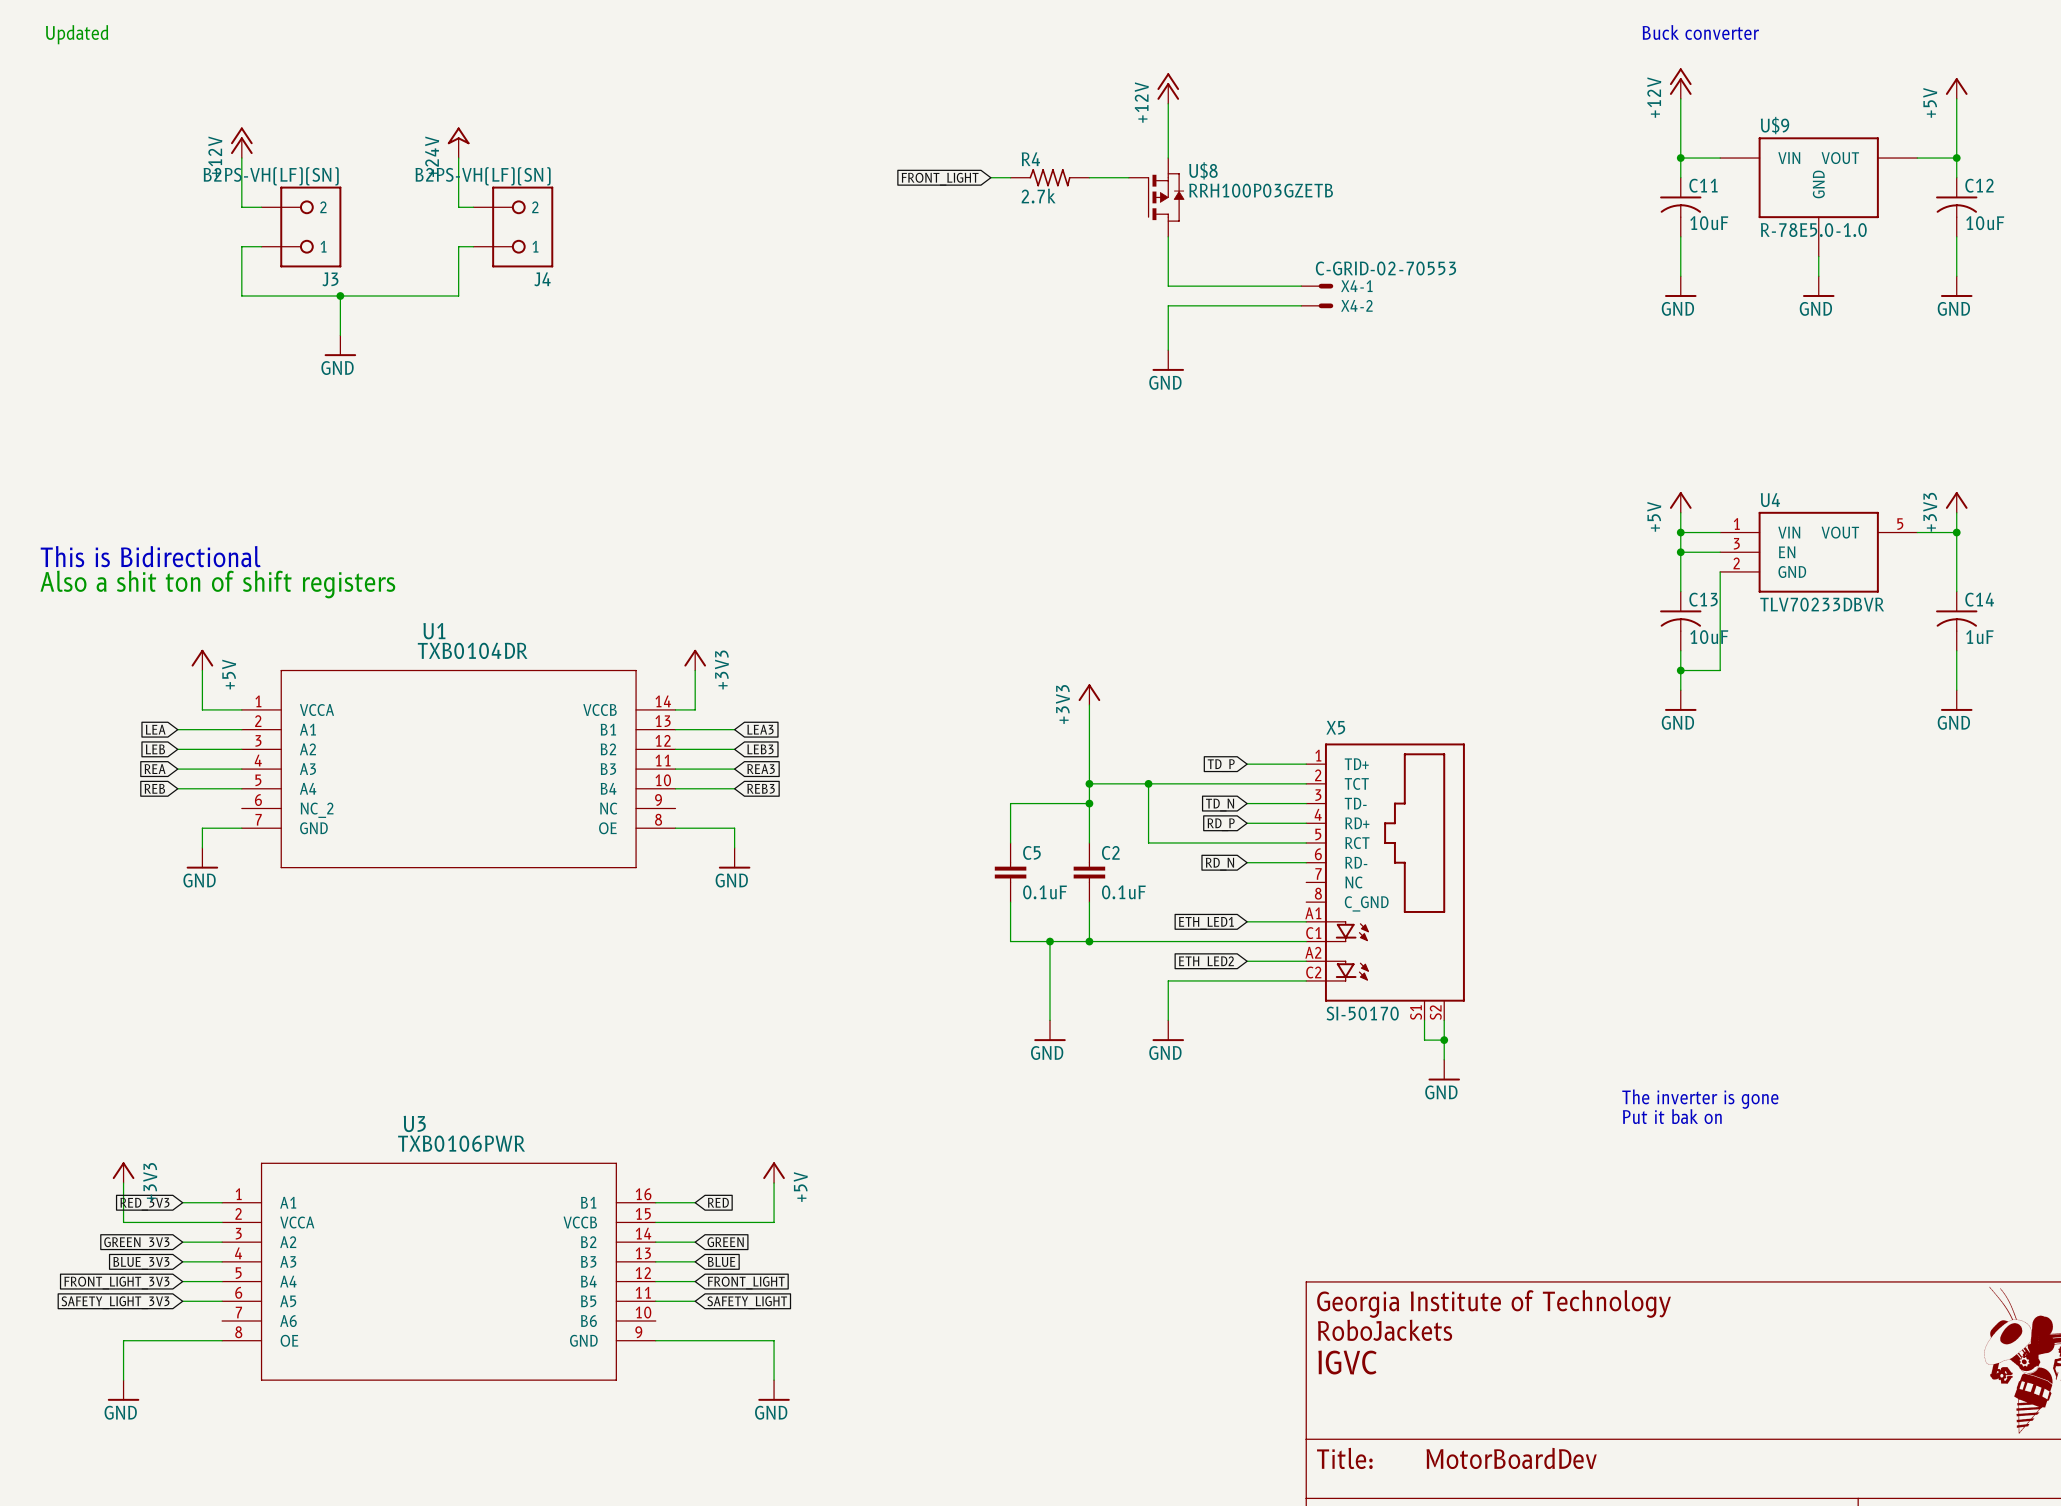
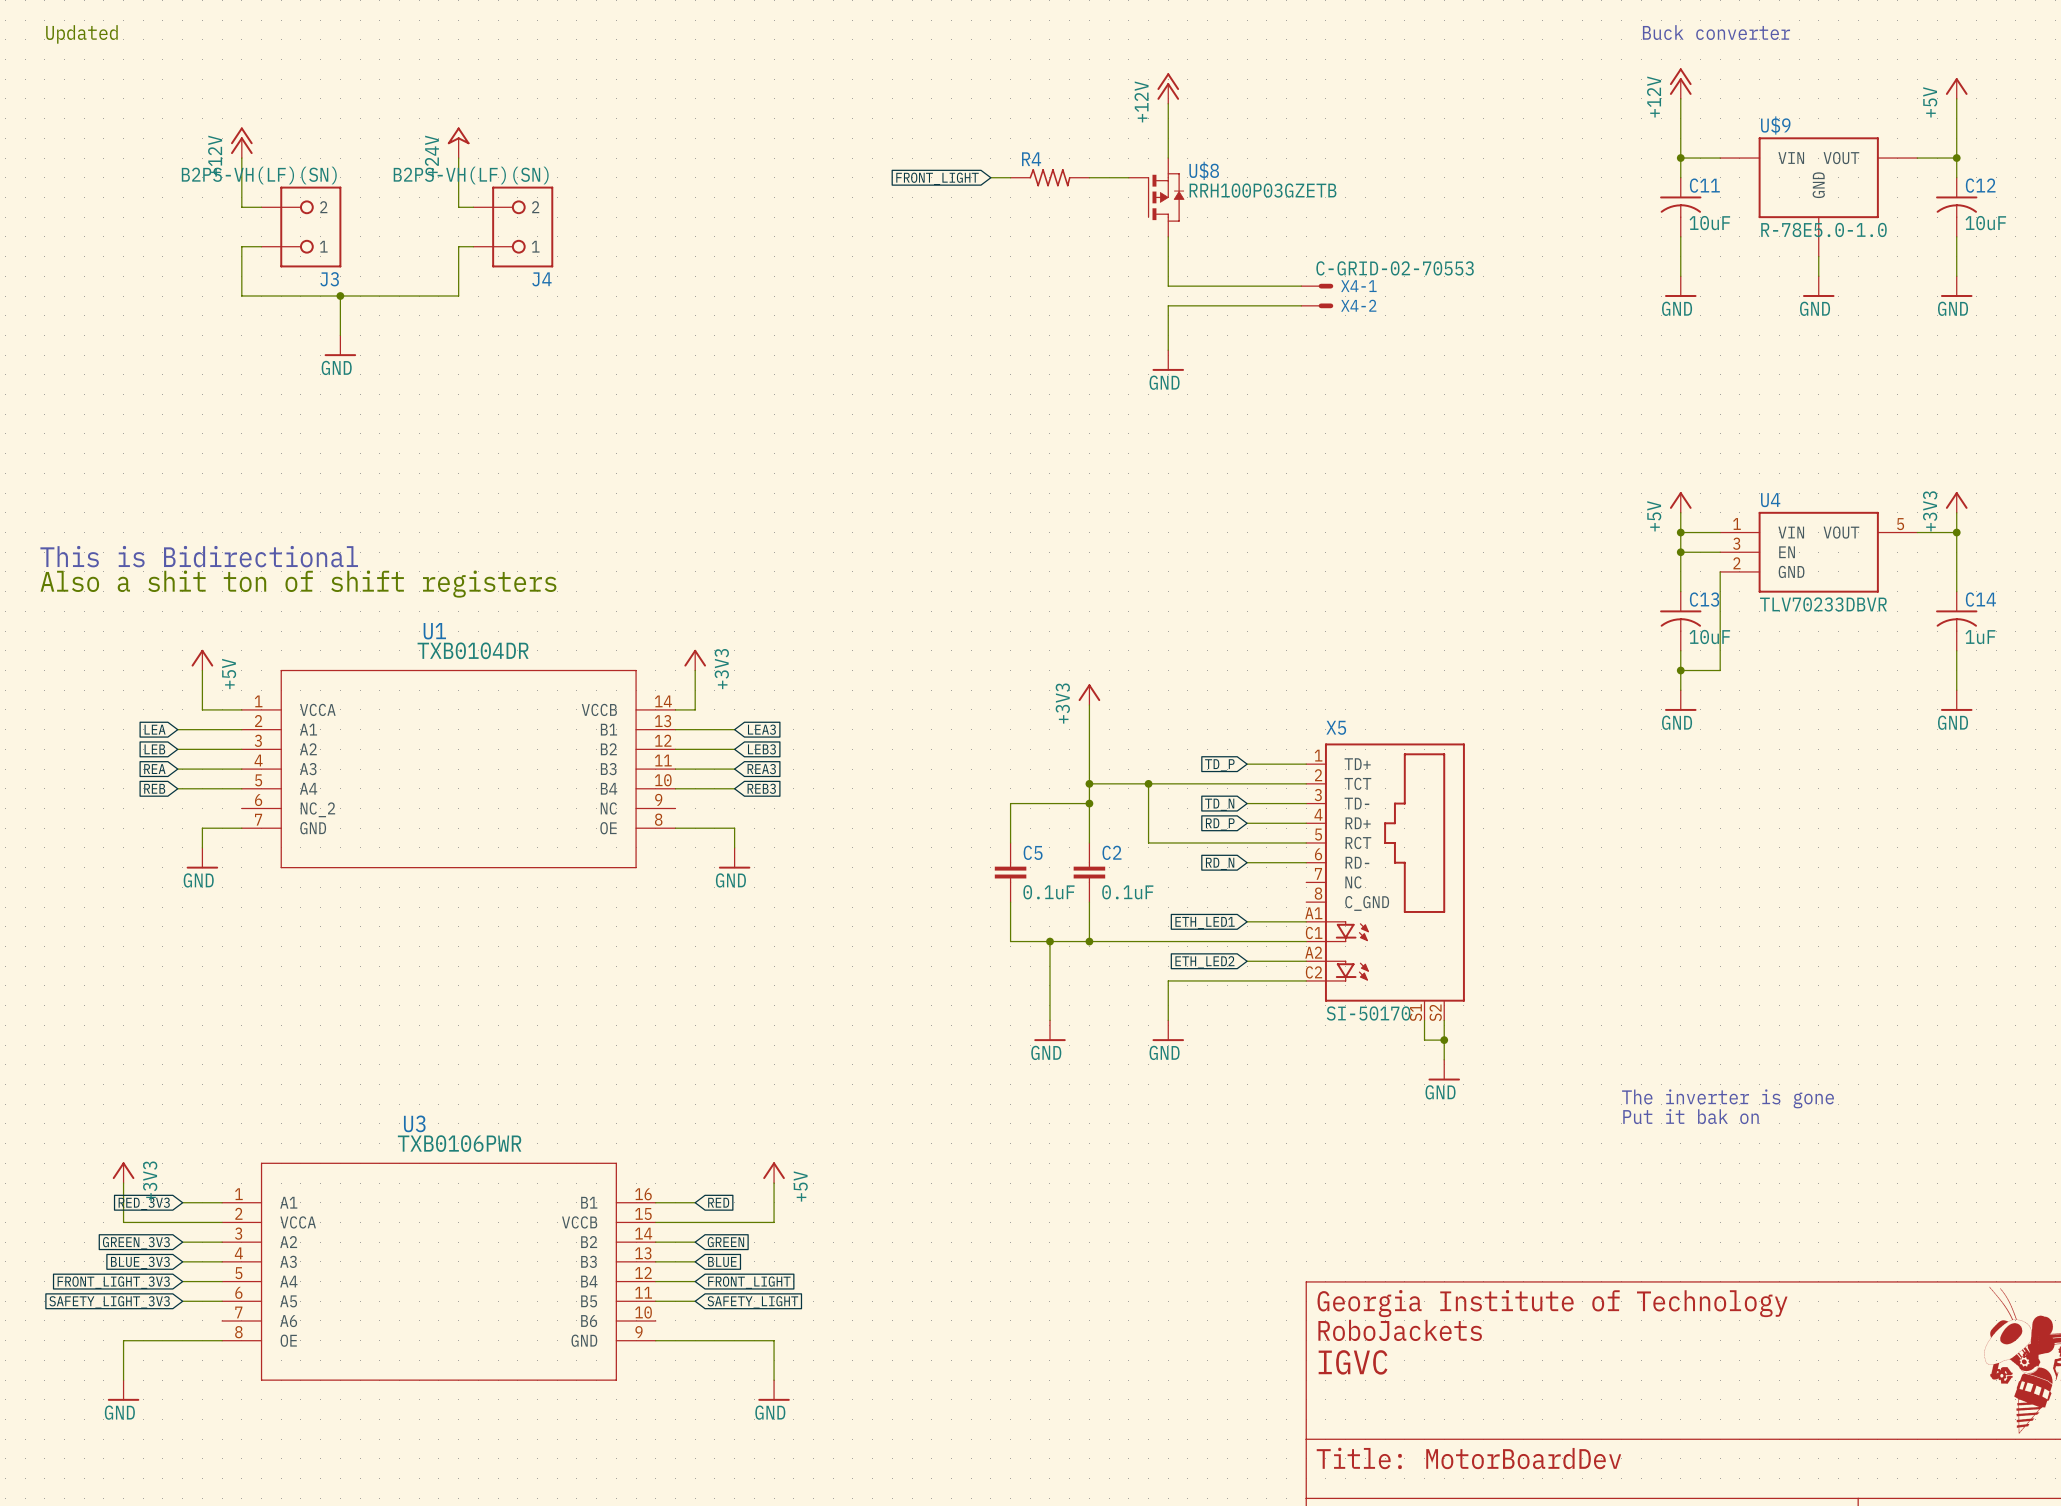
R4 value: 2.7k (1038, 196) -> none

